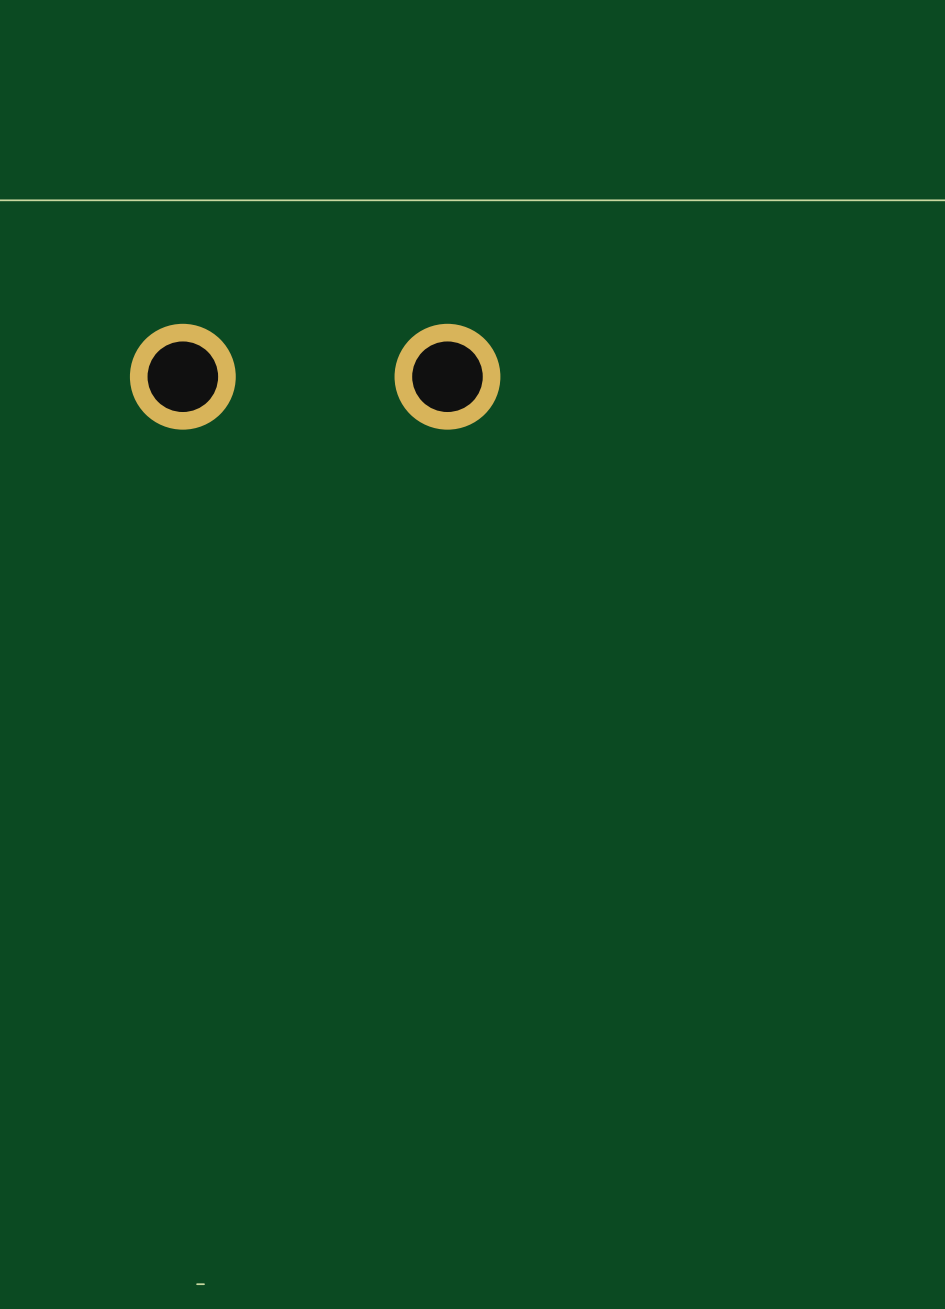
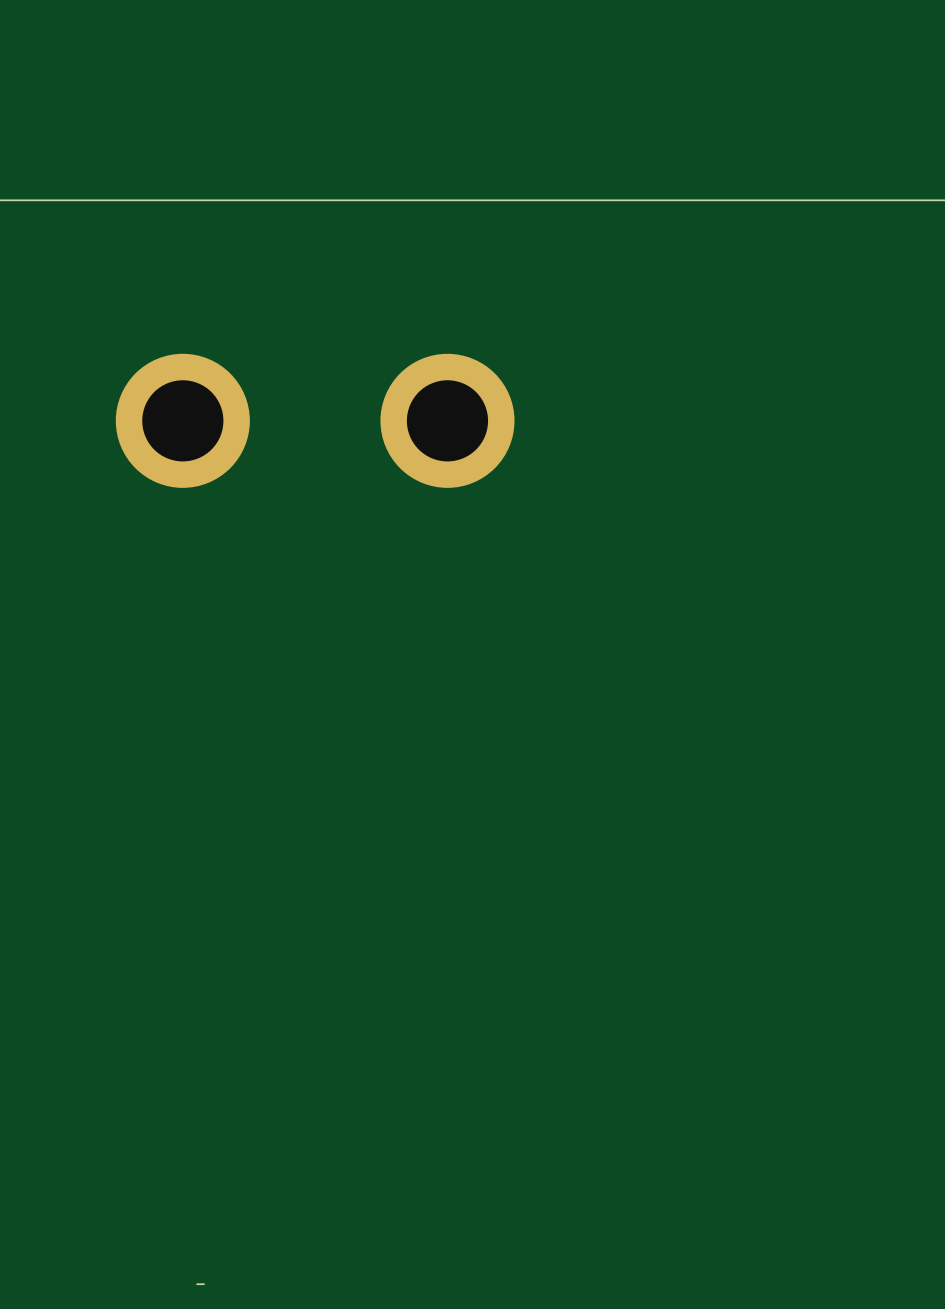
part footprint: [129, 323, 501, 430] -> [115, 353, 515, 488]

